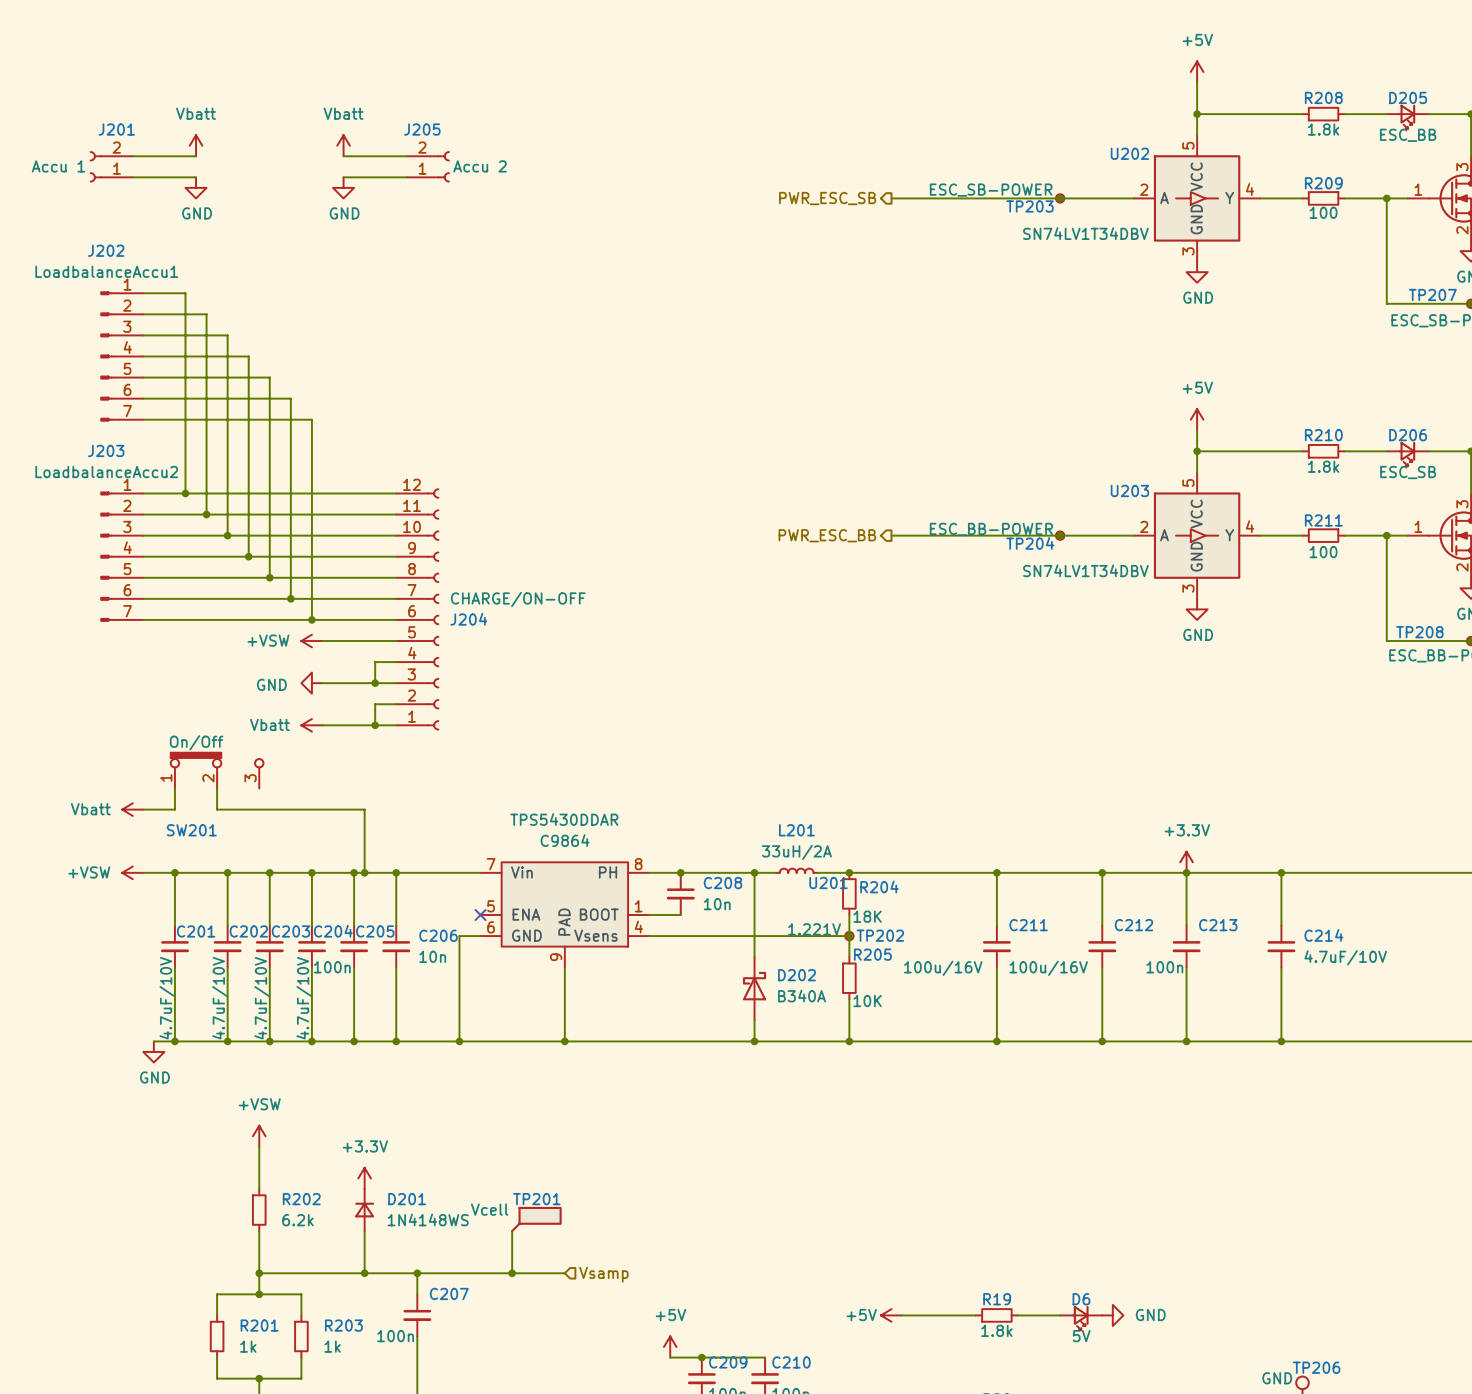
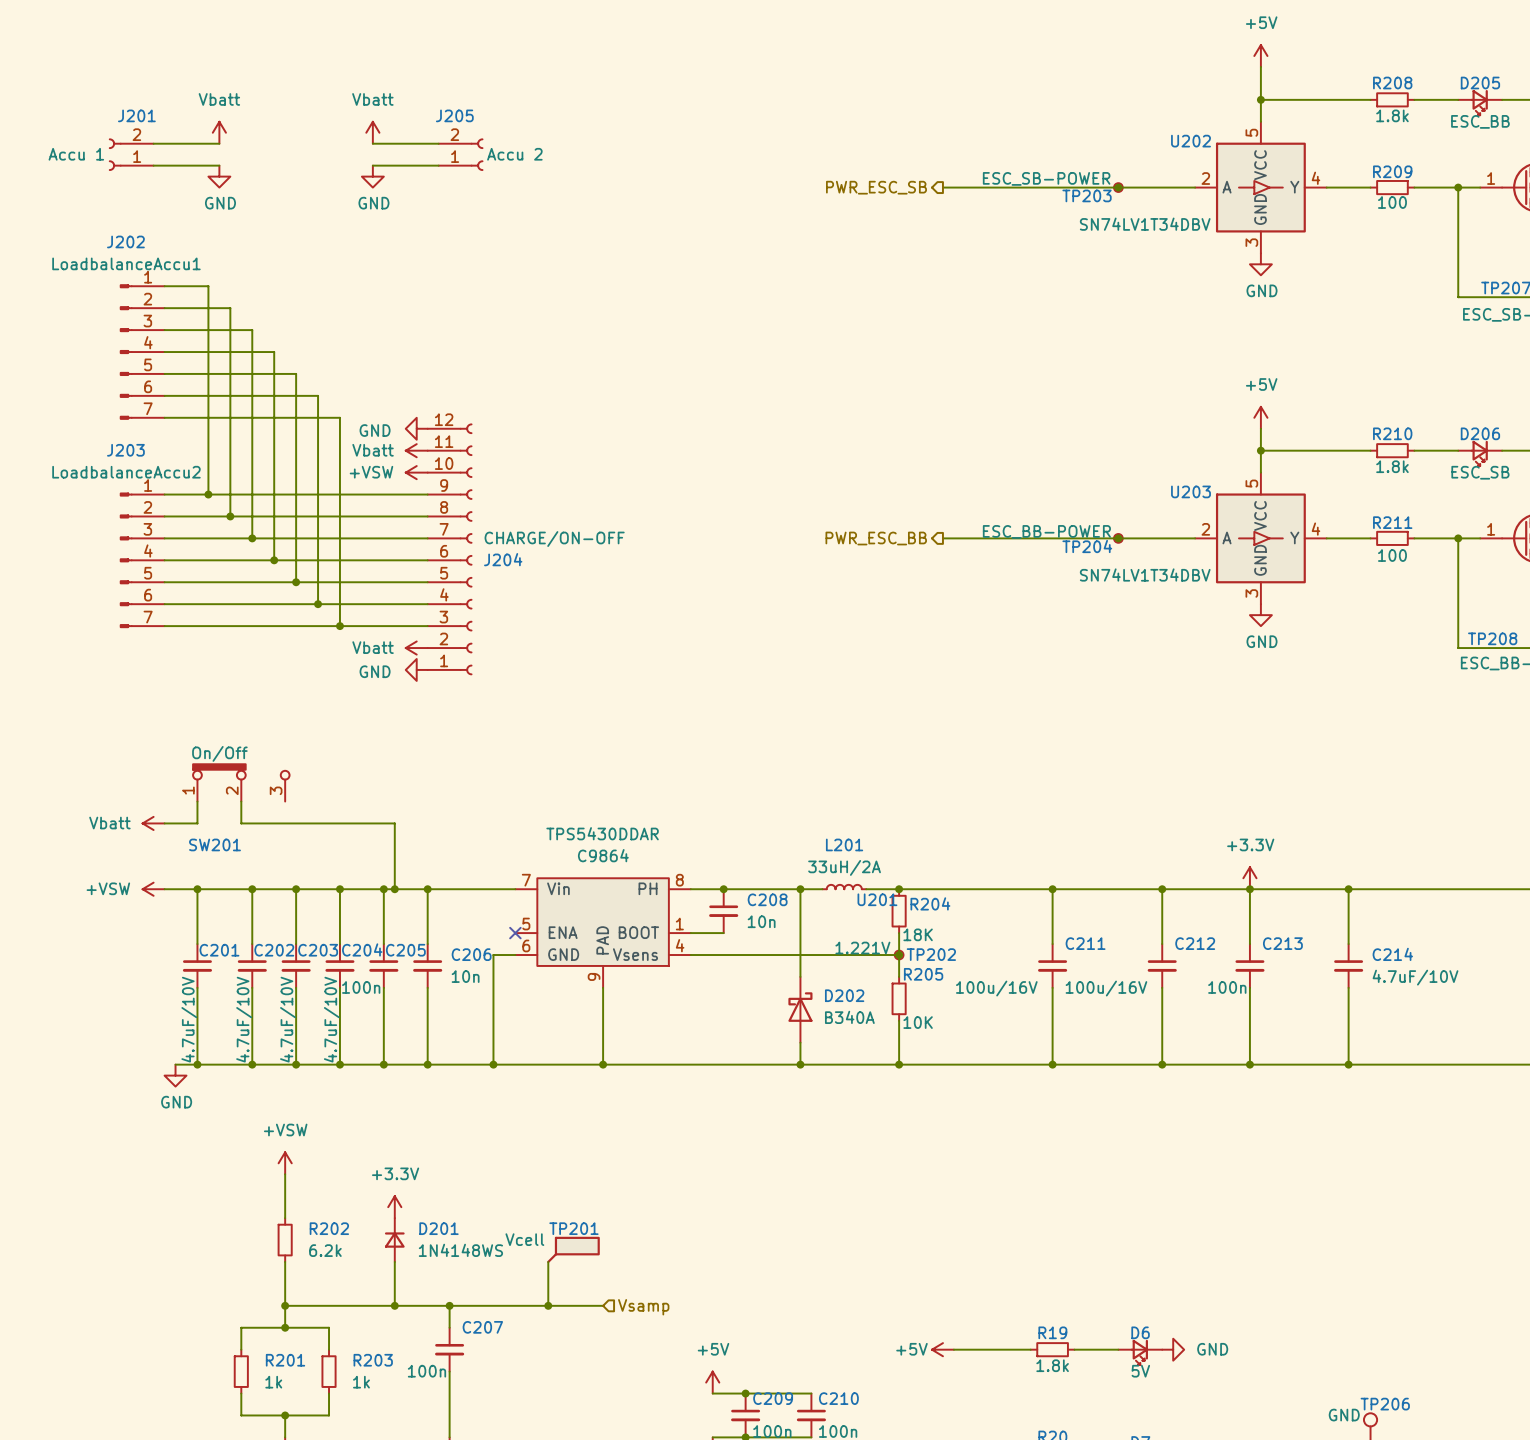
power symbol: none -> GND (416, 428)
power symbol: none -> Vbatt (416, 450)
J204 position: (417, 609) -> (449, 549)
power symbol position: +VSW (311, 641) -> +VSW (416, 472)
wire: (322, 641) (396, 641) -> none
wire: (396, 662) (375, 662) (375, 683) -> none
power symbol position: GND (311, 683) -> GND (416, 669)
wire: (322, 683) (396, 683) -> none
junction: (375, 683) -> none
wire: (396, 704) (375, 704) (375, 725) -> none
power symbol position: Vbatt (311, 725) -> Vbatt (416, 648)
wire: (322, 725) (396, 725) -> none
junction: (375, 725) -> none

